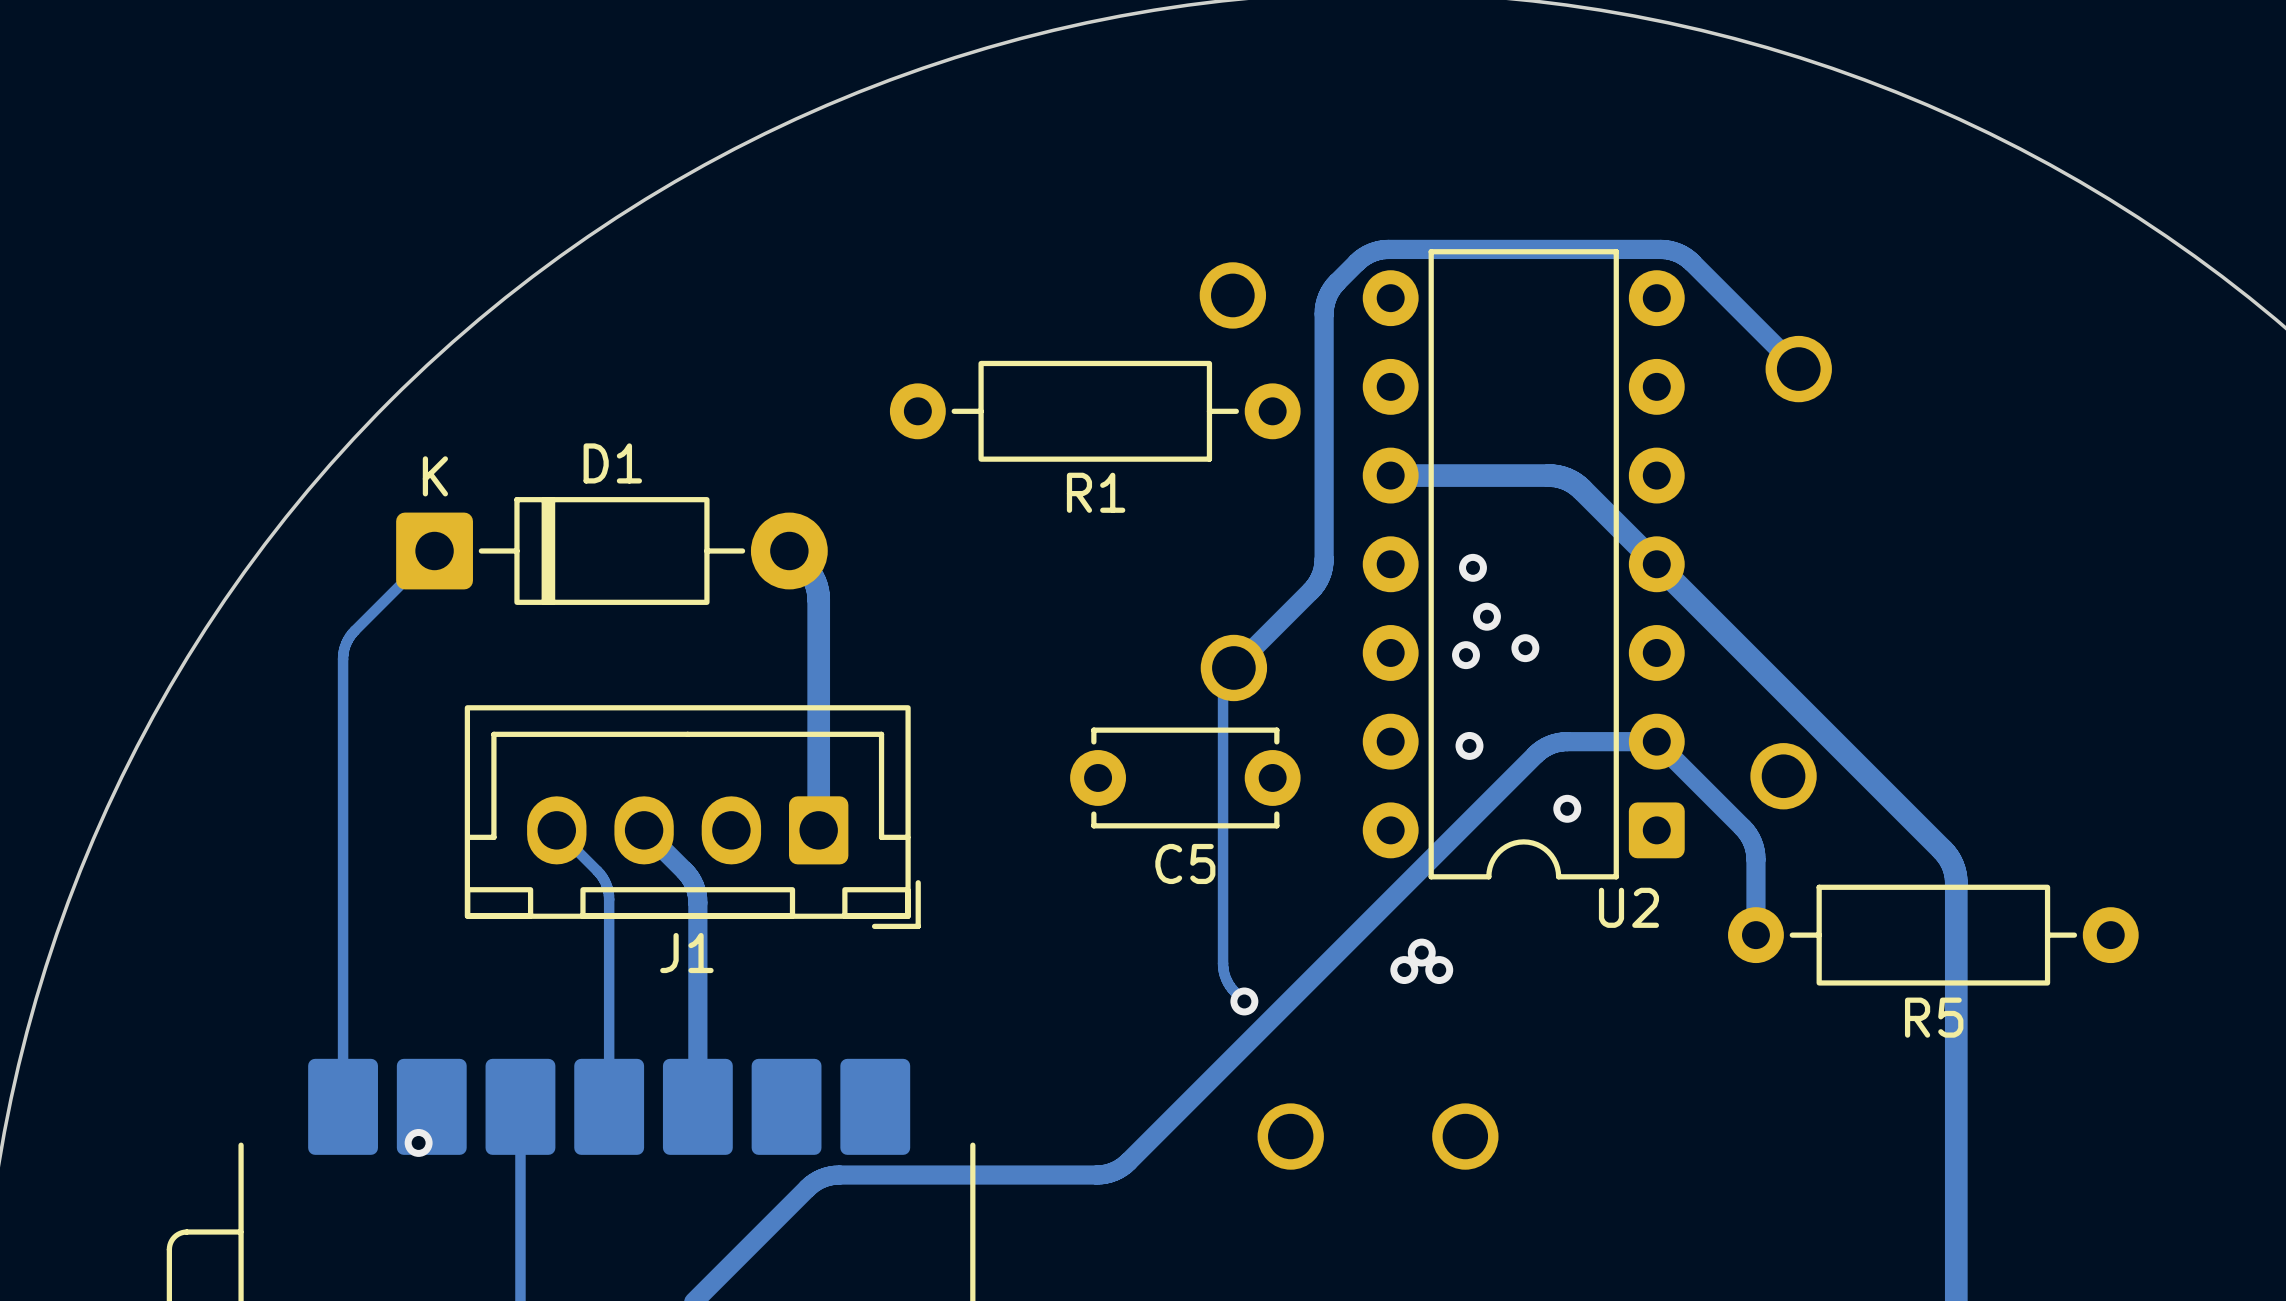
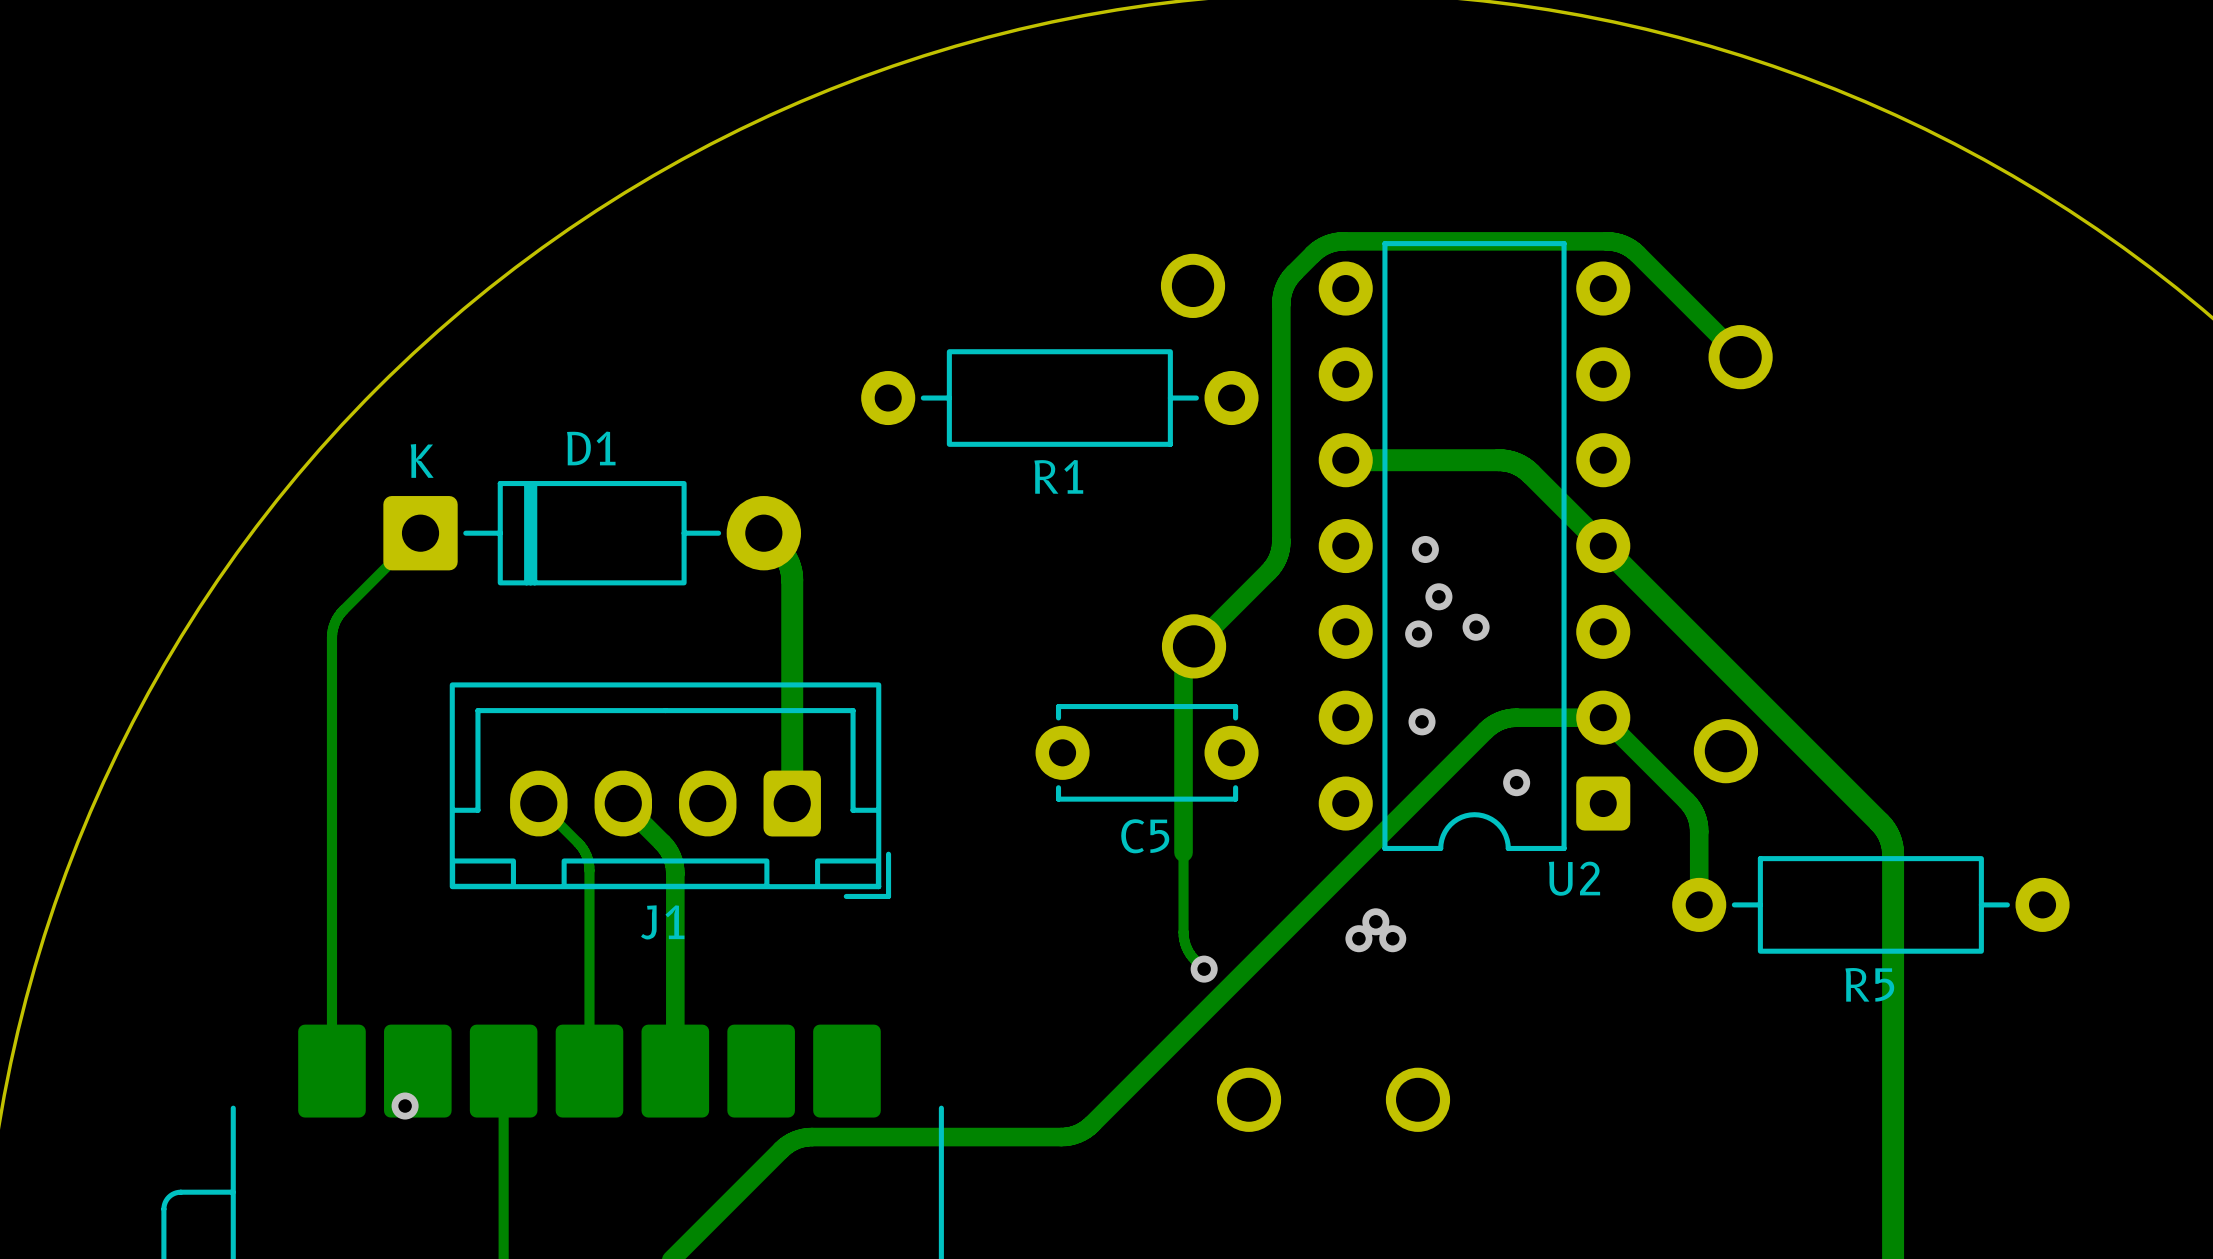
track width: thin (1223, 678) (1223, 881) -> thick (1183, 656) (1183, 852)

